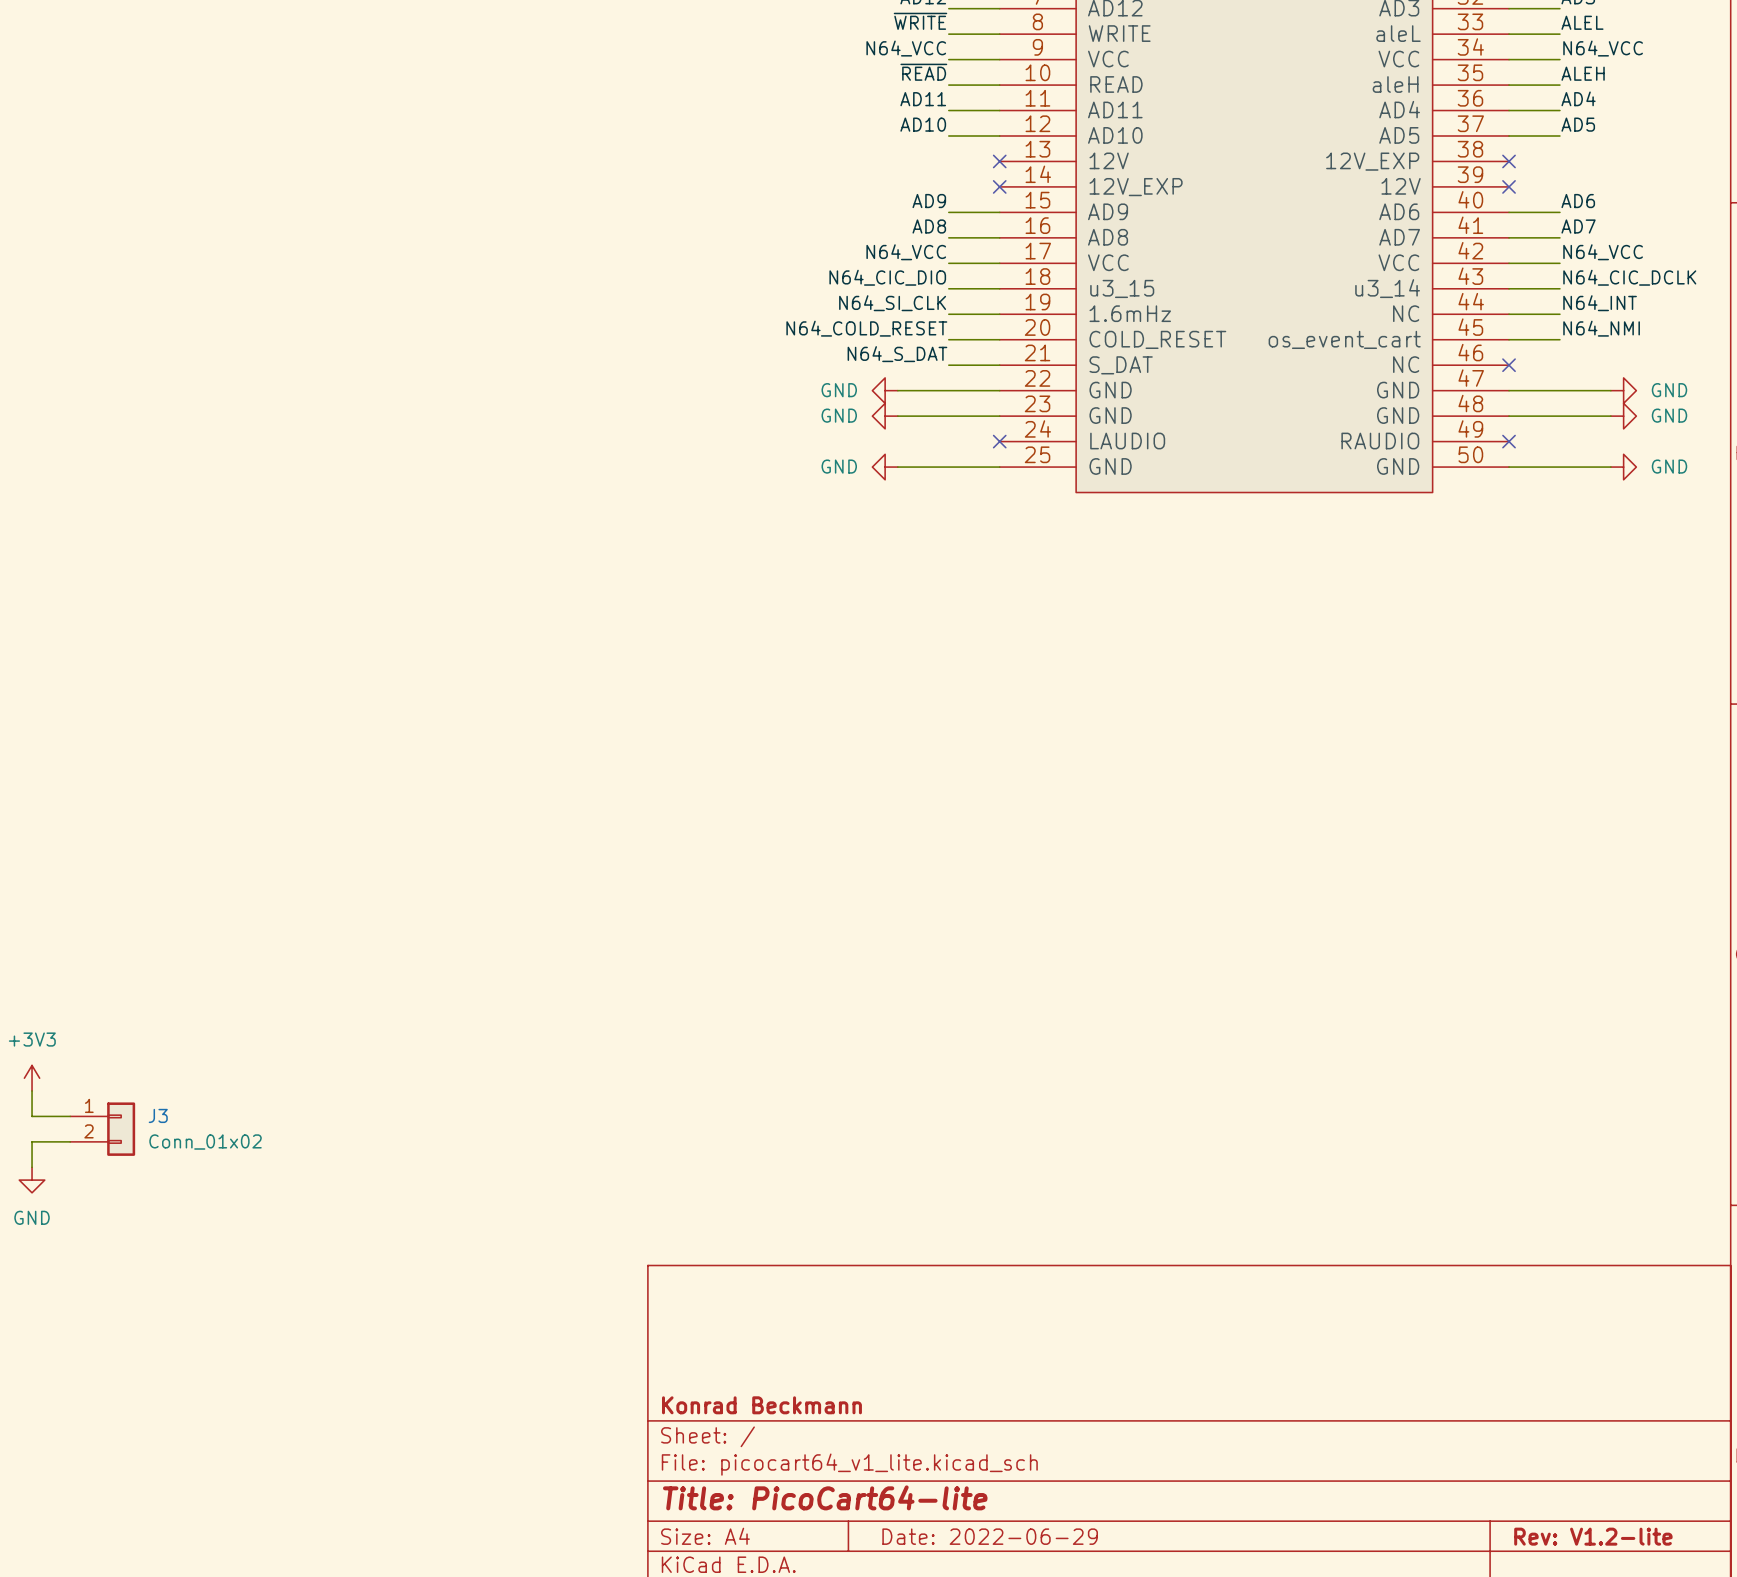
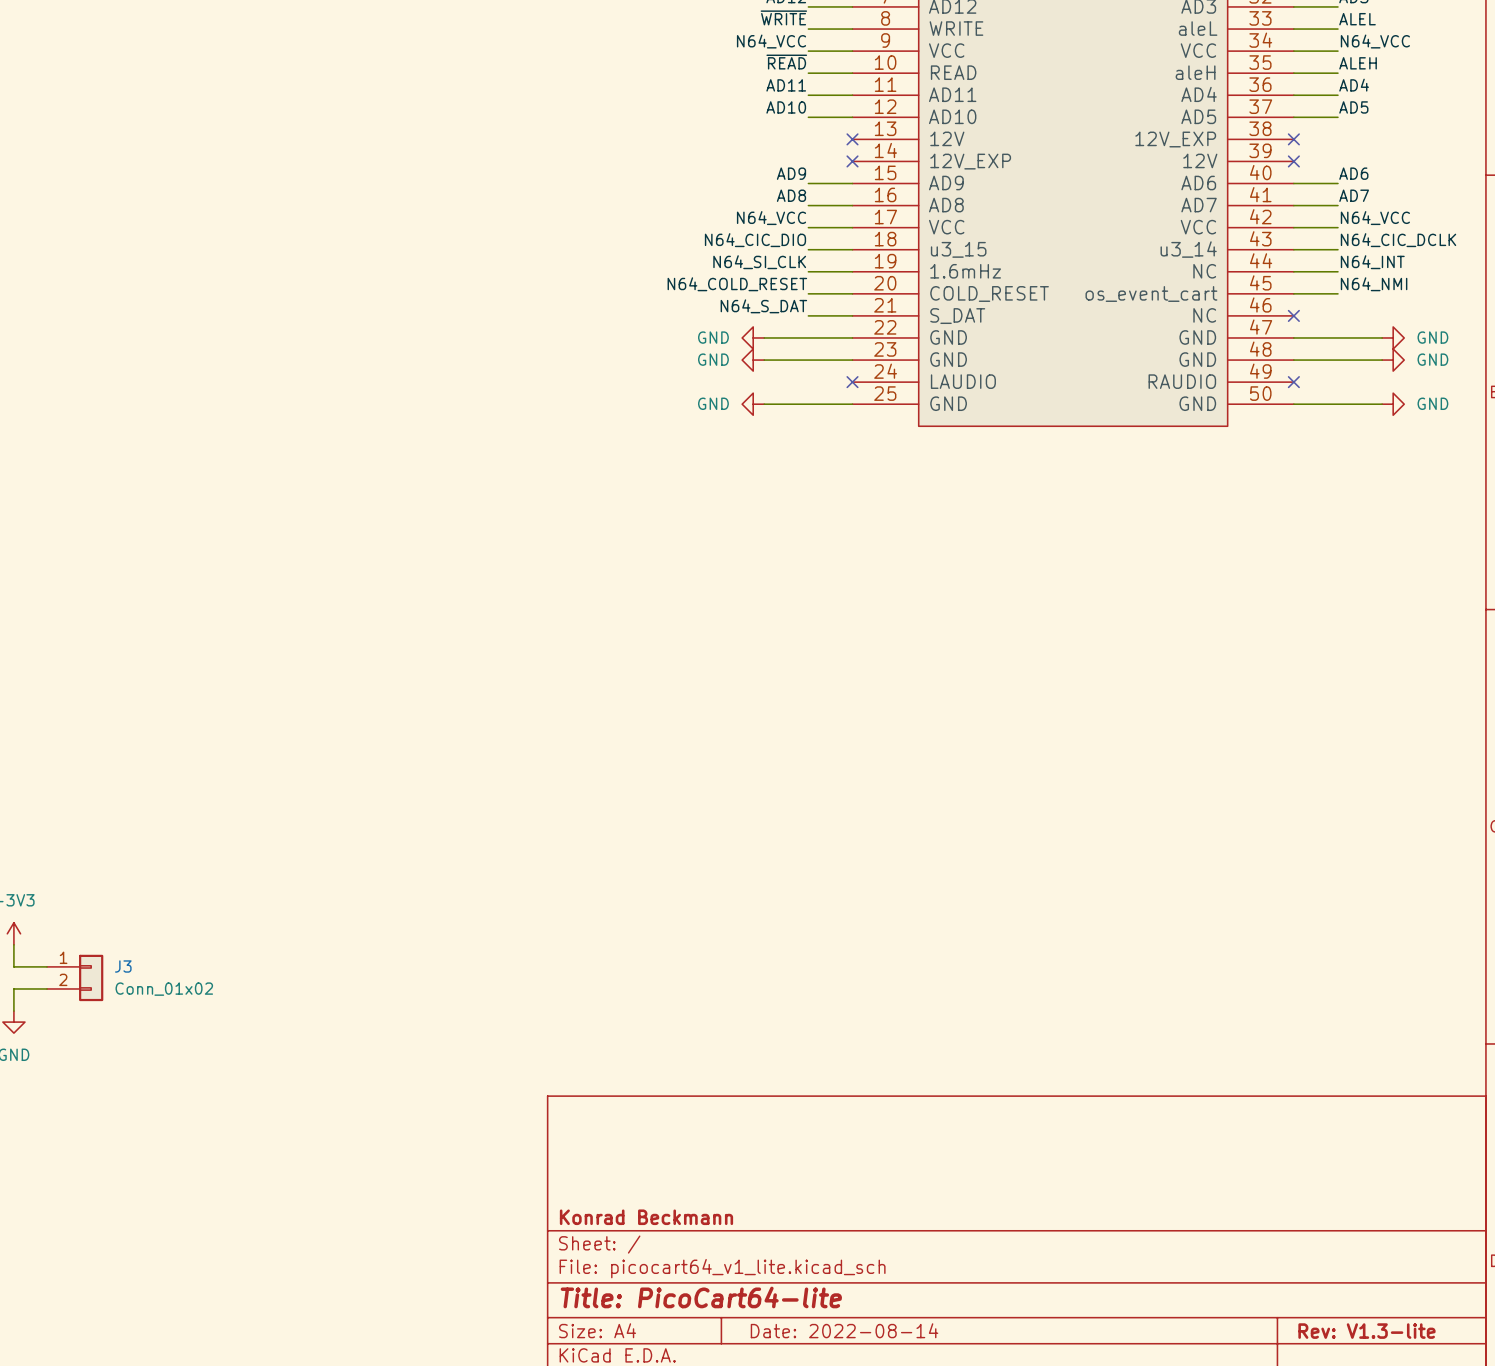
title block: Date: 2022-06-29 (990, 1536) -> Date: 2022-08-14 (844, 1330)
title block: Rev: V1.2-lite (1593, 1536) -> Rev: V1.3-lite (1366, 1331)

